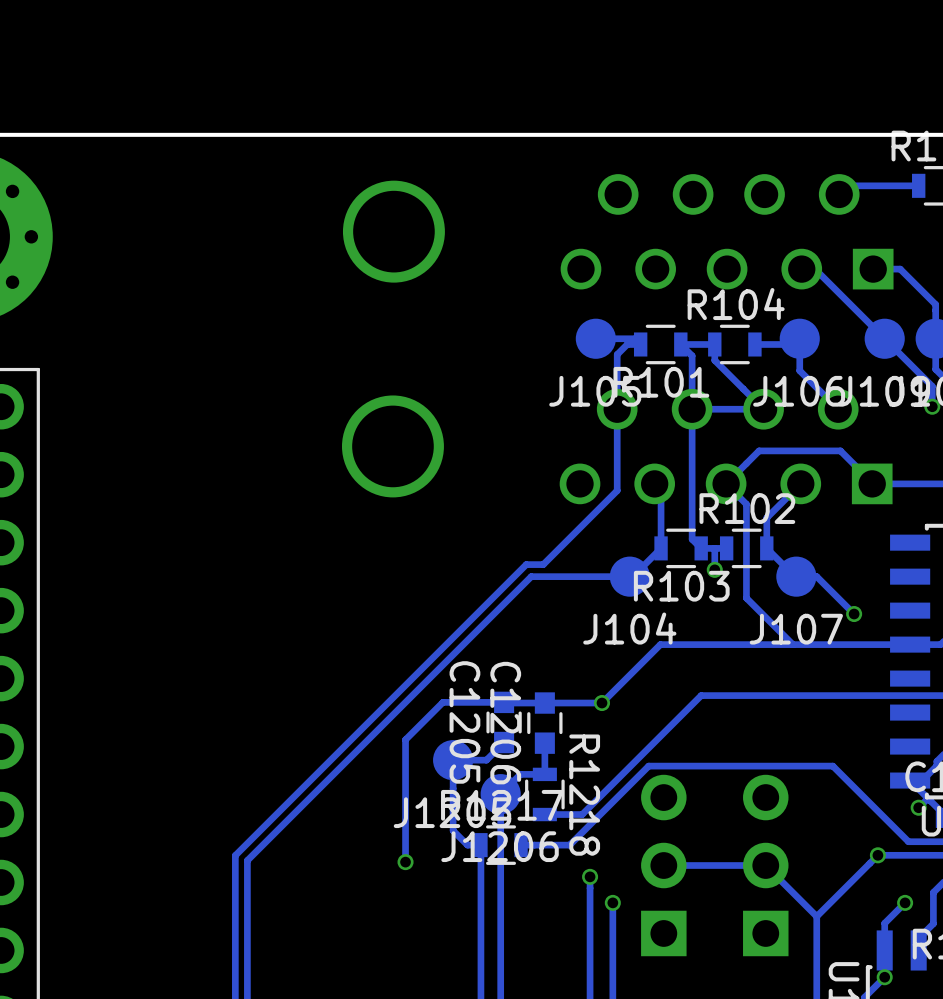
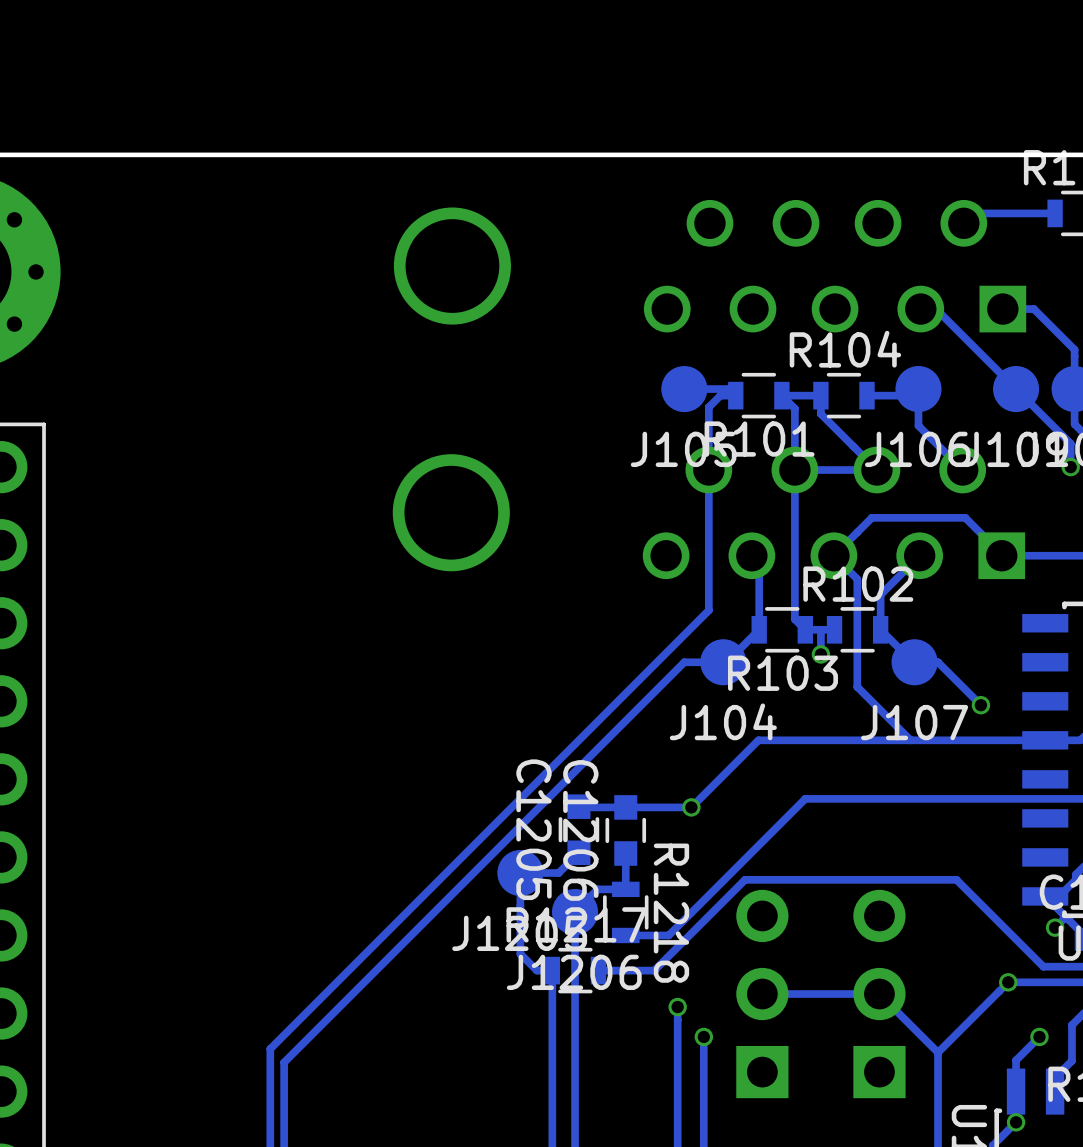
track: (617, 490) (543, 564) (526, 564) (235, 855) (235, 913) -> (708, 563) (708, 610) (270, 1048)
track: (595, 576) (531, 576) (247, 860) (247, 925) -> (684, 662) (284, 1062)
track: (504, 702) (442, 702) (405, 739) (405, 862) -> none
via: (405, 862) -> none

